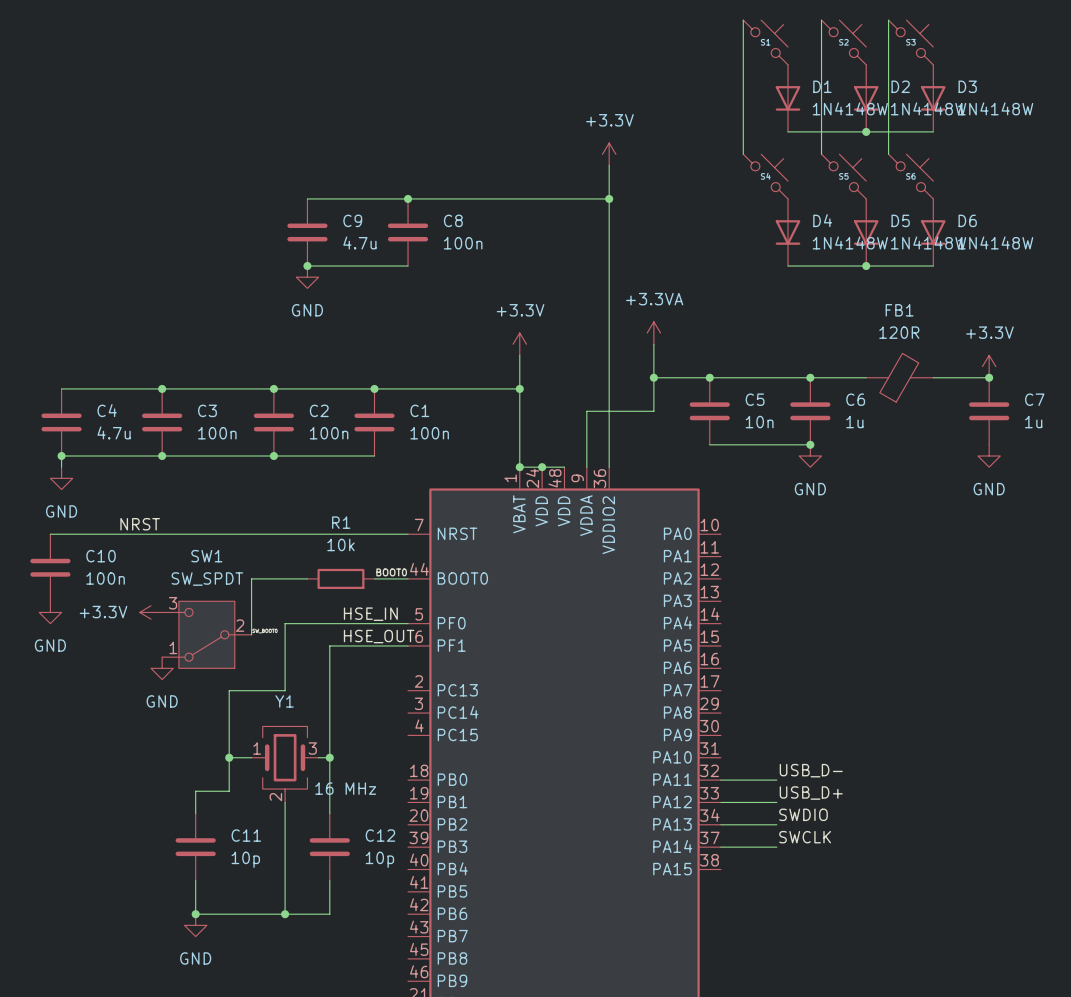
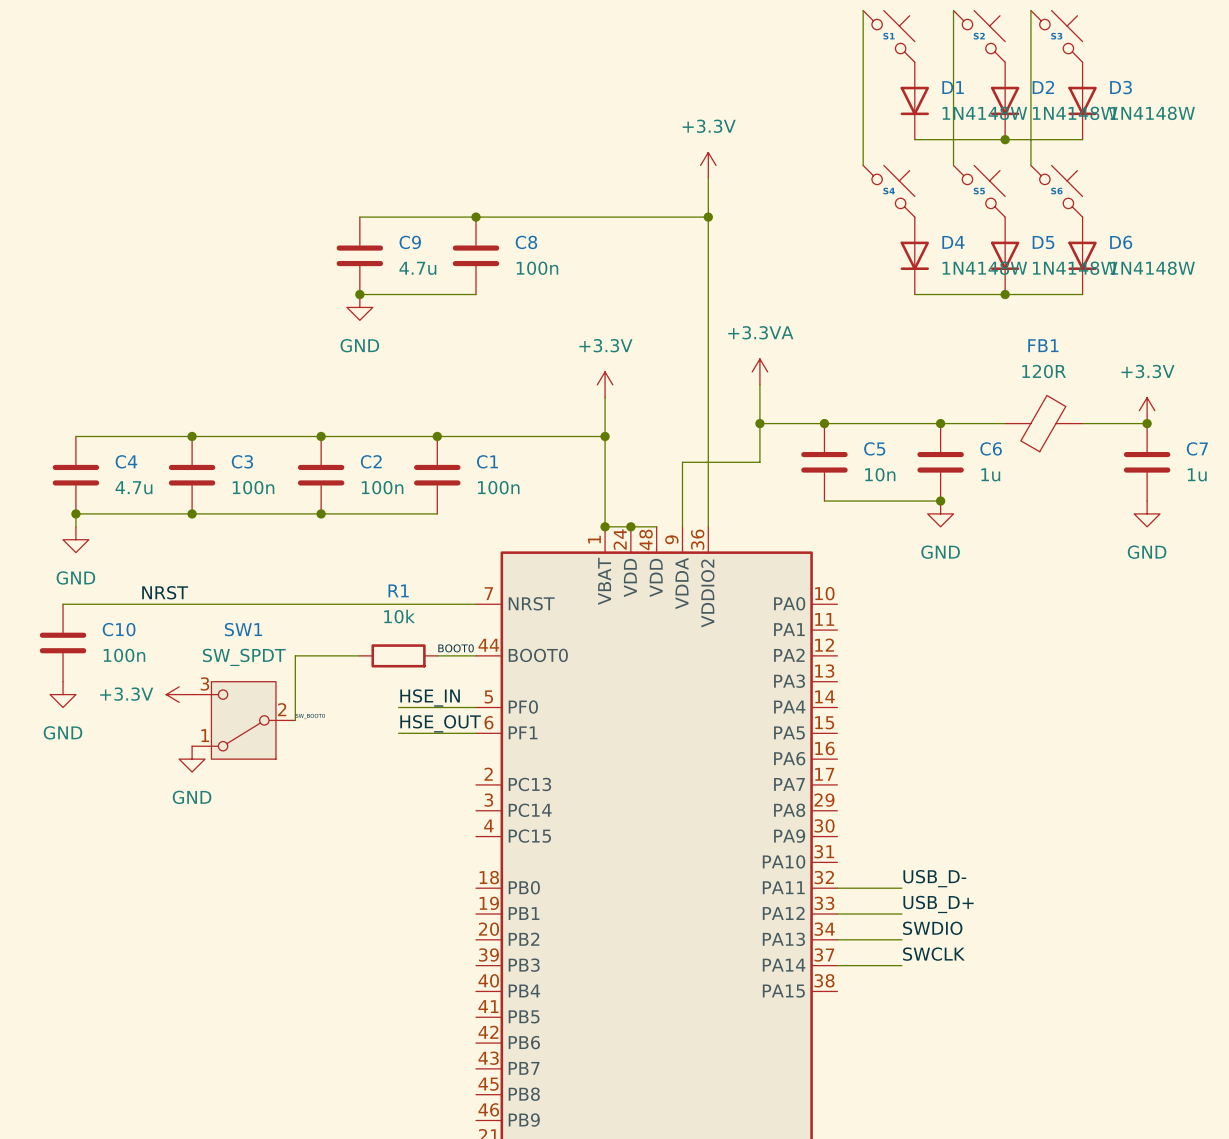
wire: (340, 623) (285, 623) (285, 690) (229, 690) (229, 791) (195, 791) (195, 813) -> none
wire: (340, 645) (329, 645) (329, 813) -> none
wire: (229, 757) (251, 757) -> none
junction: (229, 757) -> none
wire: (318, 757) (329, 757) -> none
junction: (329, 757) -> none
Y1: 16 MHz (285, 764) -> none
wire: (285, 802) (285, 914) -> none
C11: 10p (195, 847) -> none
C12: 10p (329, 847) -> none
wire: (195, 880) (195, 914) (329, 914) (329, 880) -> none
junction: (195, 914) -> none
junction: (285, 914) -> none
power symbol: GND (195, 925) -> none

